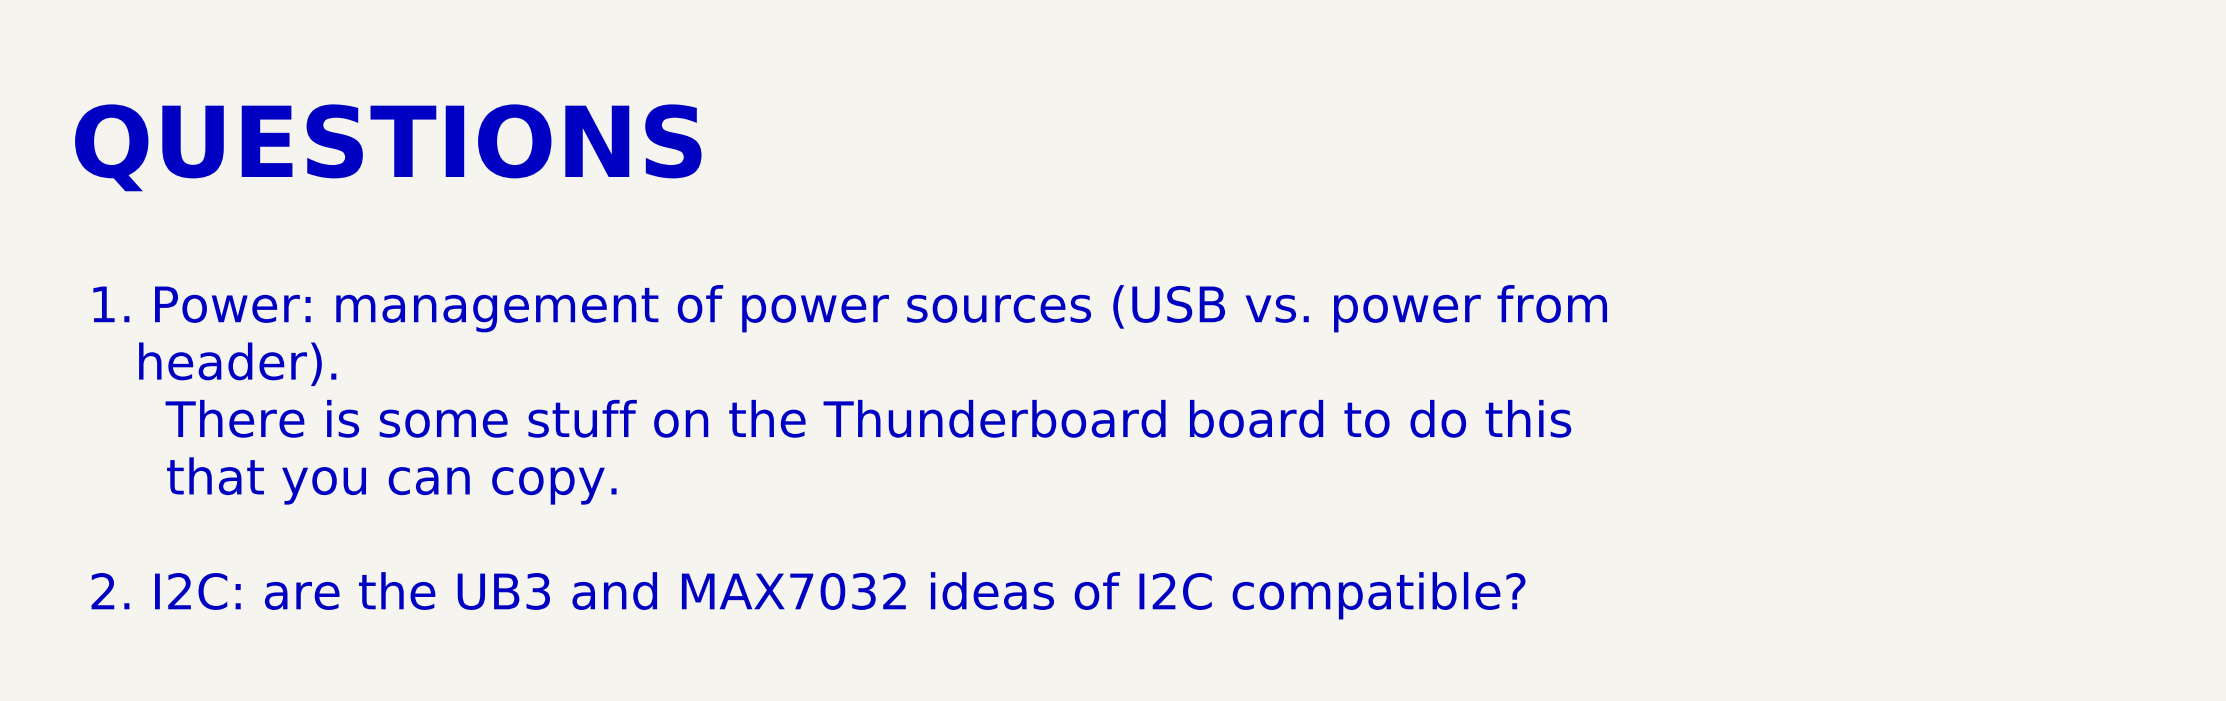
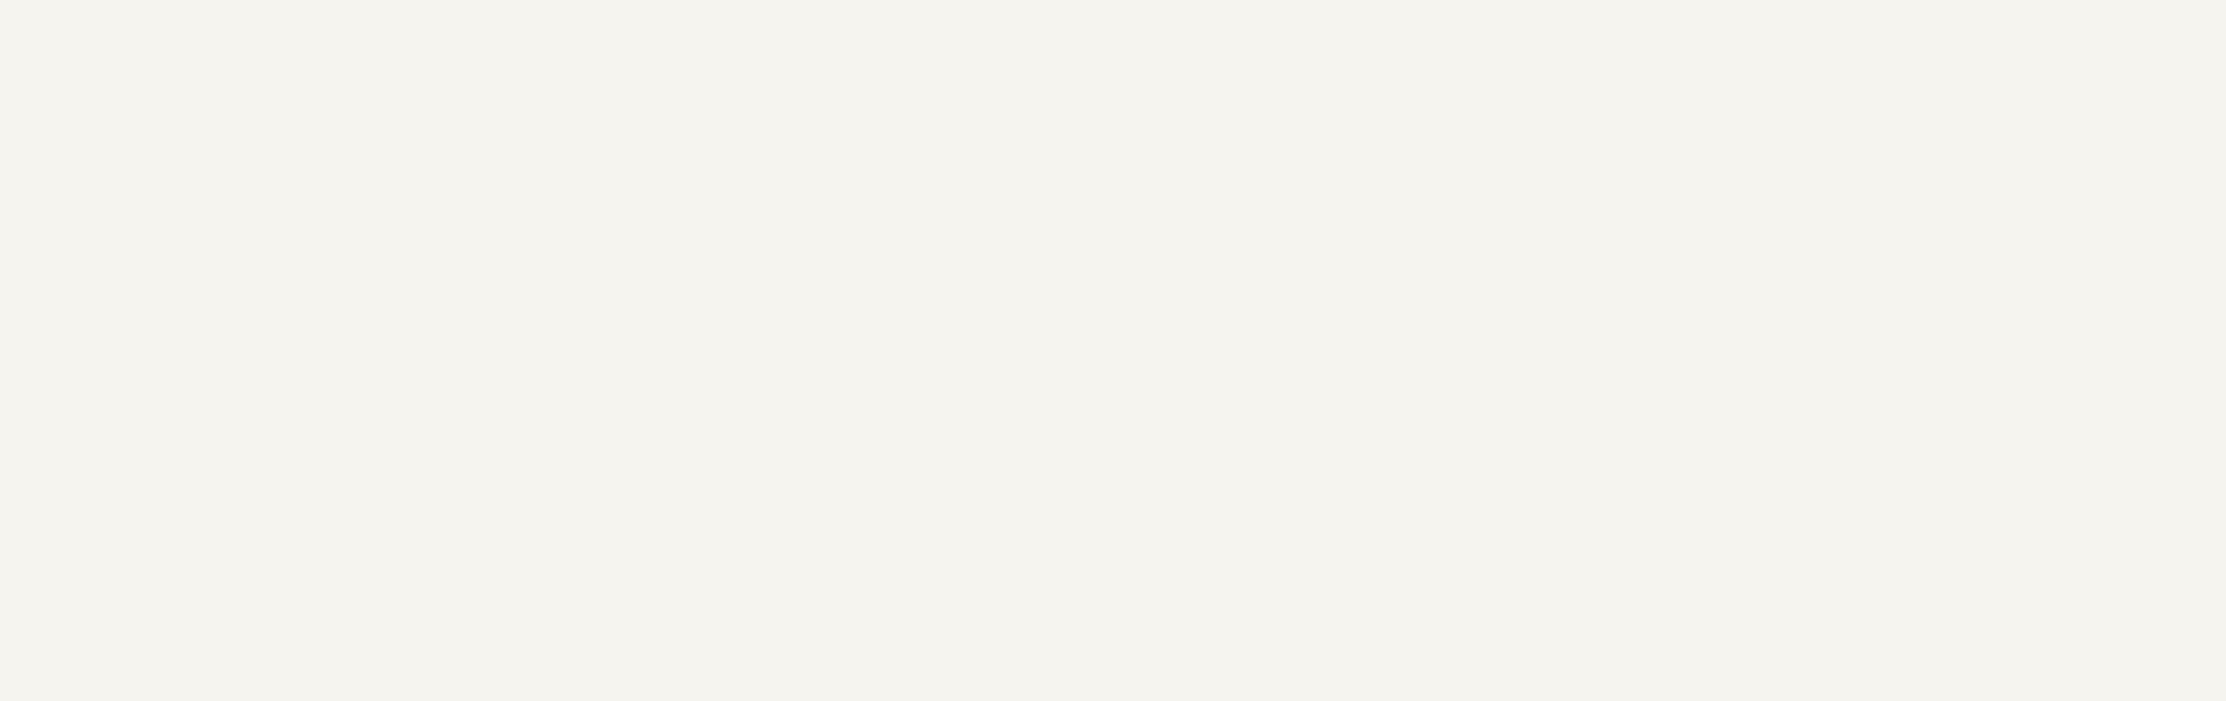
text: QUESTIONS (388, 147) -> none
text: 1. Power: management of power sources (USB vs. power from (850, 308) -> none
text: header). (237, 364) -> none
text: There is some stuff on the Thunderboard board to do this (868, 418) -> none
text: that you can copy. (391, 480) -> none
text: 2. I2C: are the UB3 and MAX7032 ideas of I2C compatible? (808, 595) -> none

